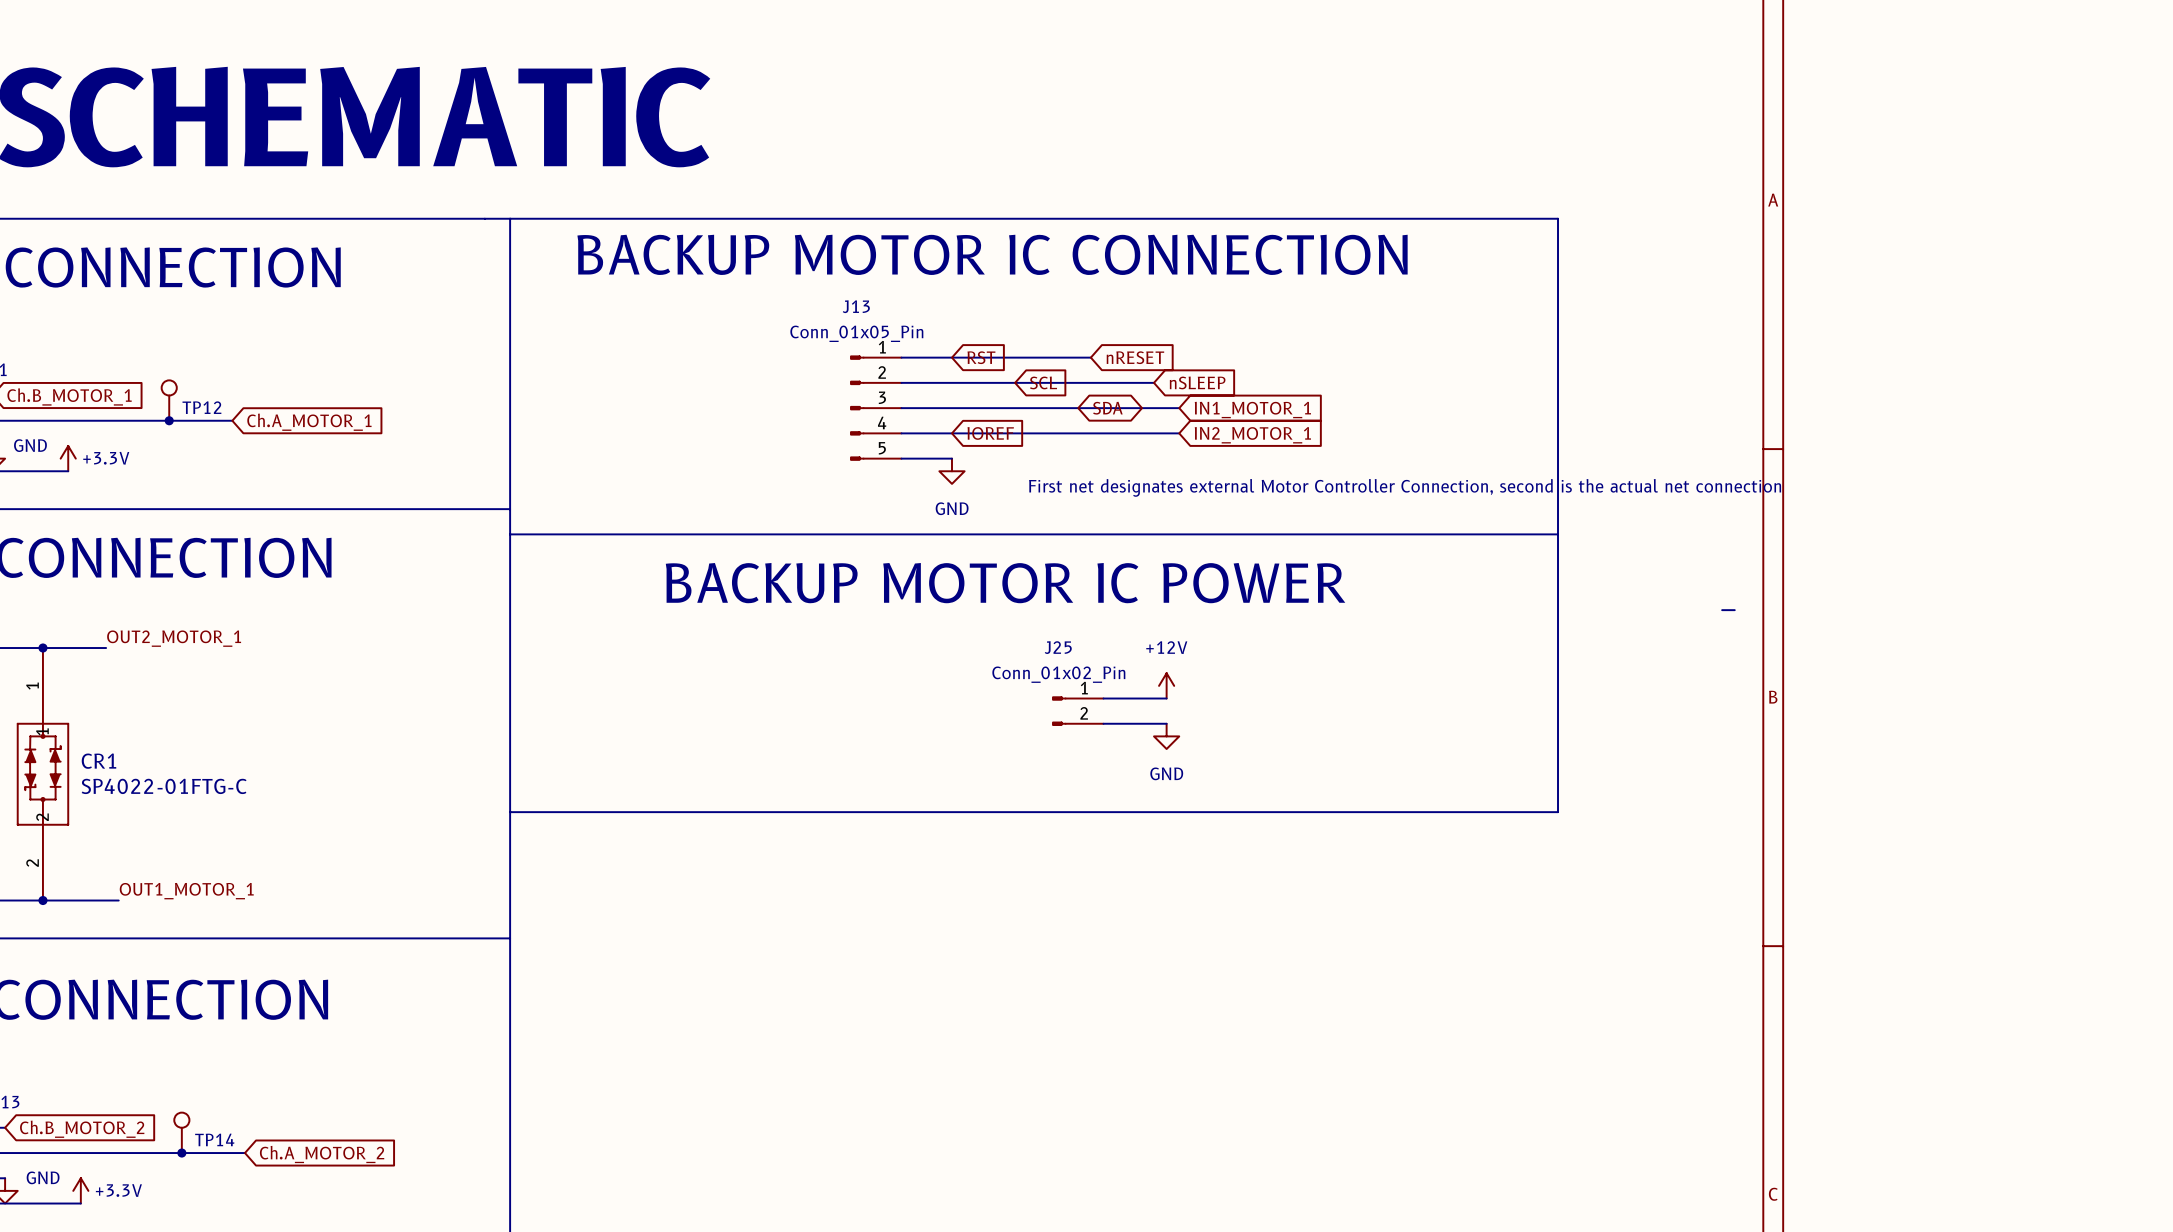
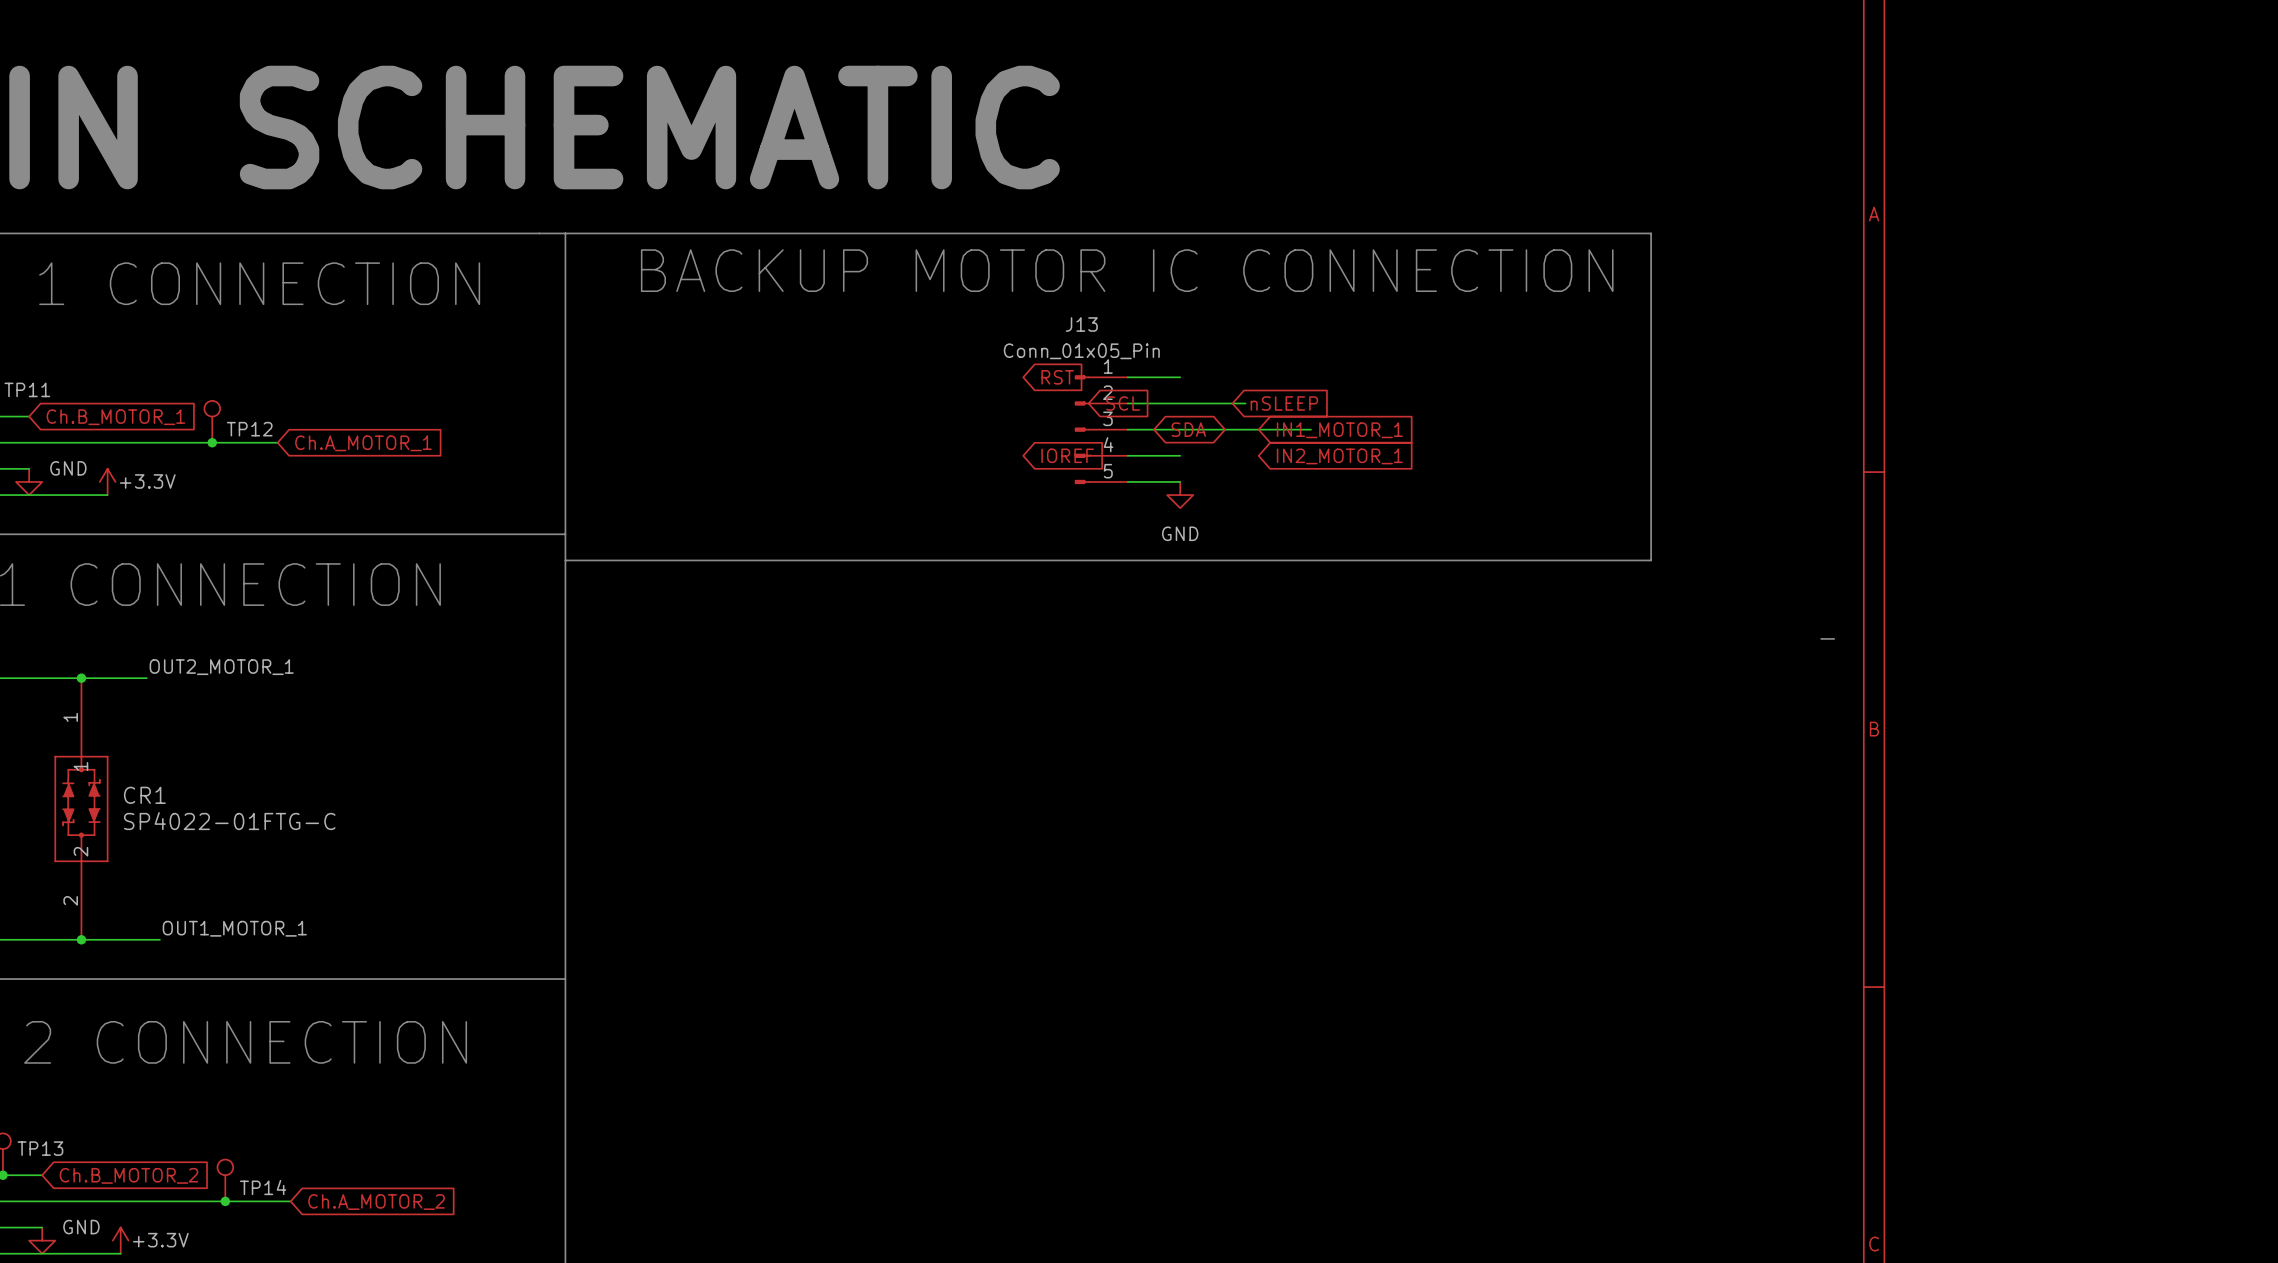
wire: (901, 357) (1052, 357) -> none
wire: none -> (1167, 377) (1180, 377)
global label: nRESET (1135, 357) -> none
wire: (901, 382) (1052, 382) -> none
wire: none -> (1232, 403) (1245, 403)
J13 position: (875, 408) -> (1101, 429)
wire: (901, 408) (1052, 408) -> none
wire: none -> (1258, 429) (1311, 429)
wire: (901, 433) (1052, 433) -> none
wire: (1103, 433) (1179, 433) -> none
wire: (901, 458) (951, 458) -> (1127, 481) (1180, 481)
power symbol: GND (951, 471) -> none
power symbol: none -> GND (1180, 495)
text: First net designates external Motor Controller Connection, second is the actual net connection (1405, 487) -> none
line: (1558, 534) (1558, 812) (510, 812) -> none
text: BACKUP MOTOR IC POWER (1005, 583) -> none
power symbol: +12V (1166, 685) -> none
wire: (1103, 698) (1166, 698) -> none
J25: Conn_01x02_Pin (1077, 711) -> none
wire: (1103, 723) (1166, 723) -> none
power symbol: GND (1166, 736) -> none

